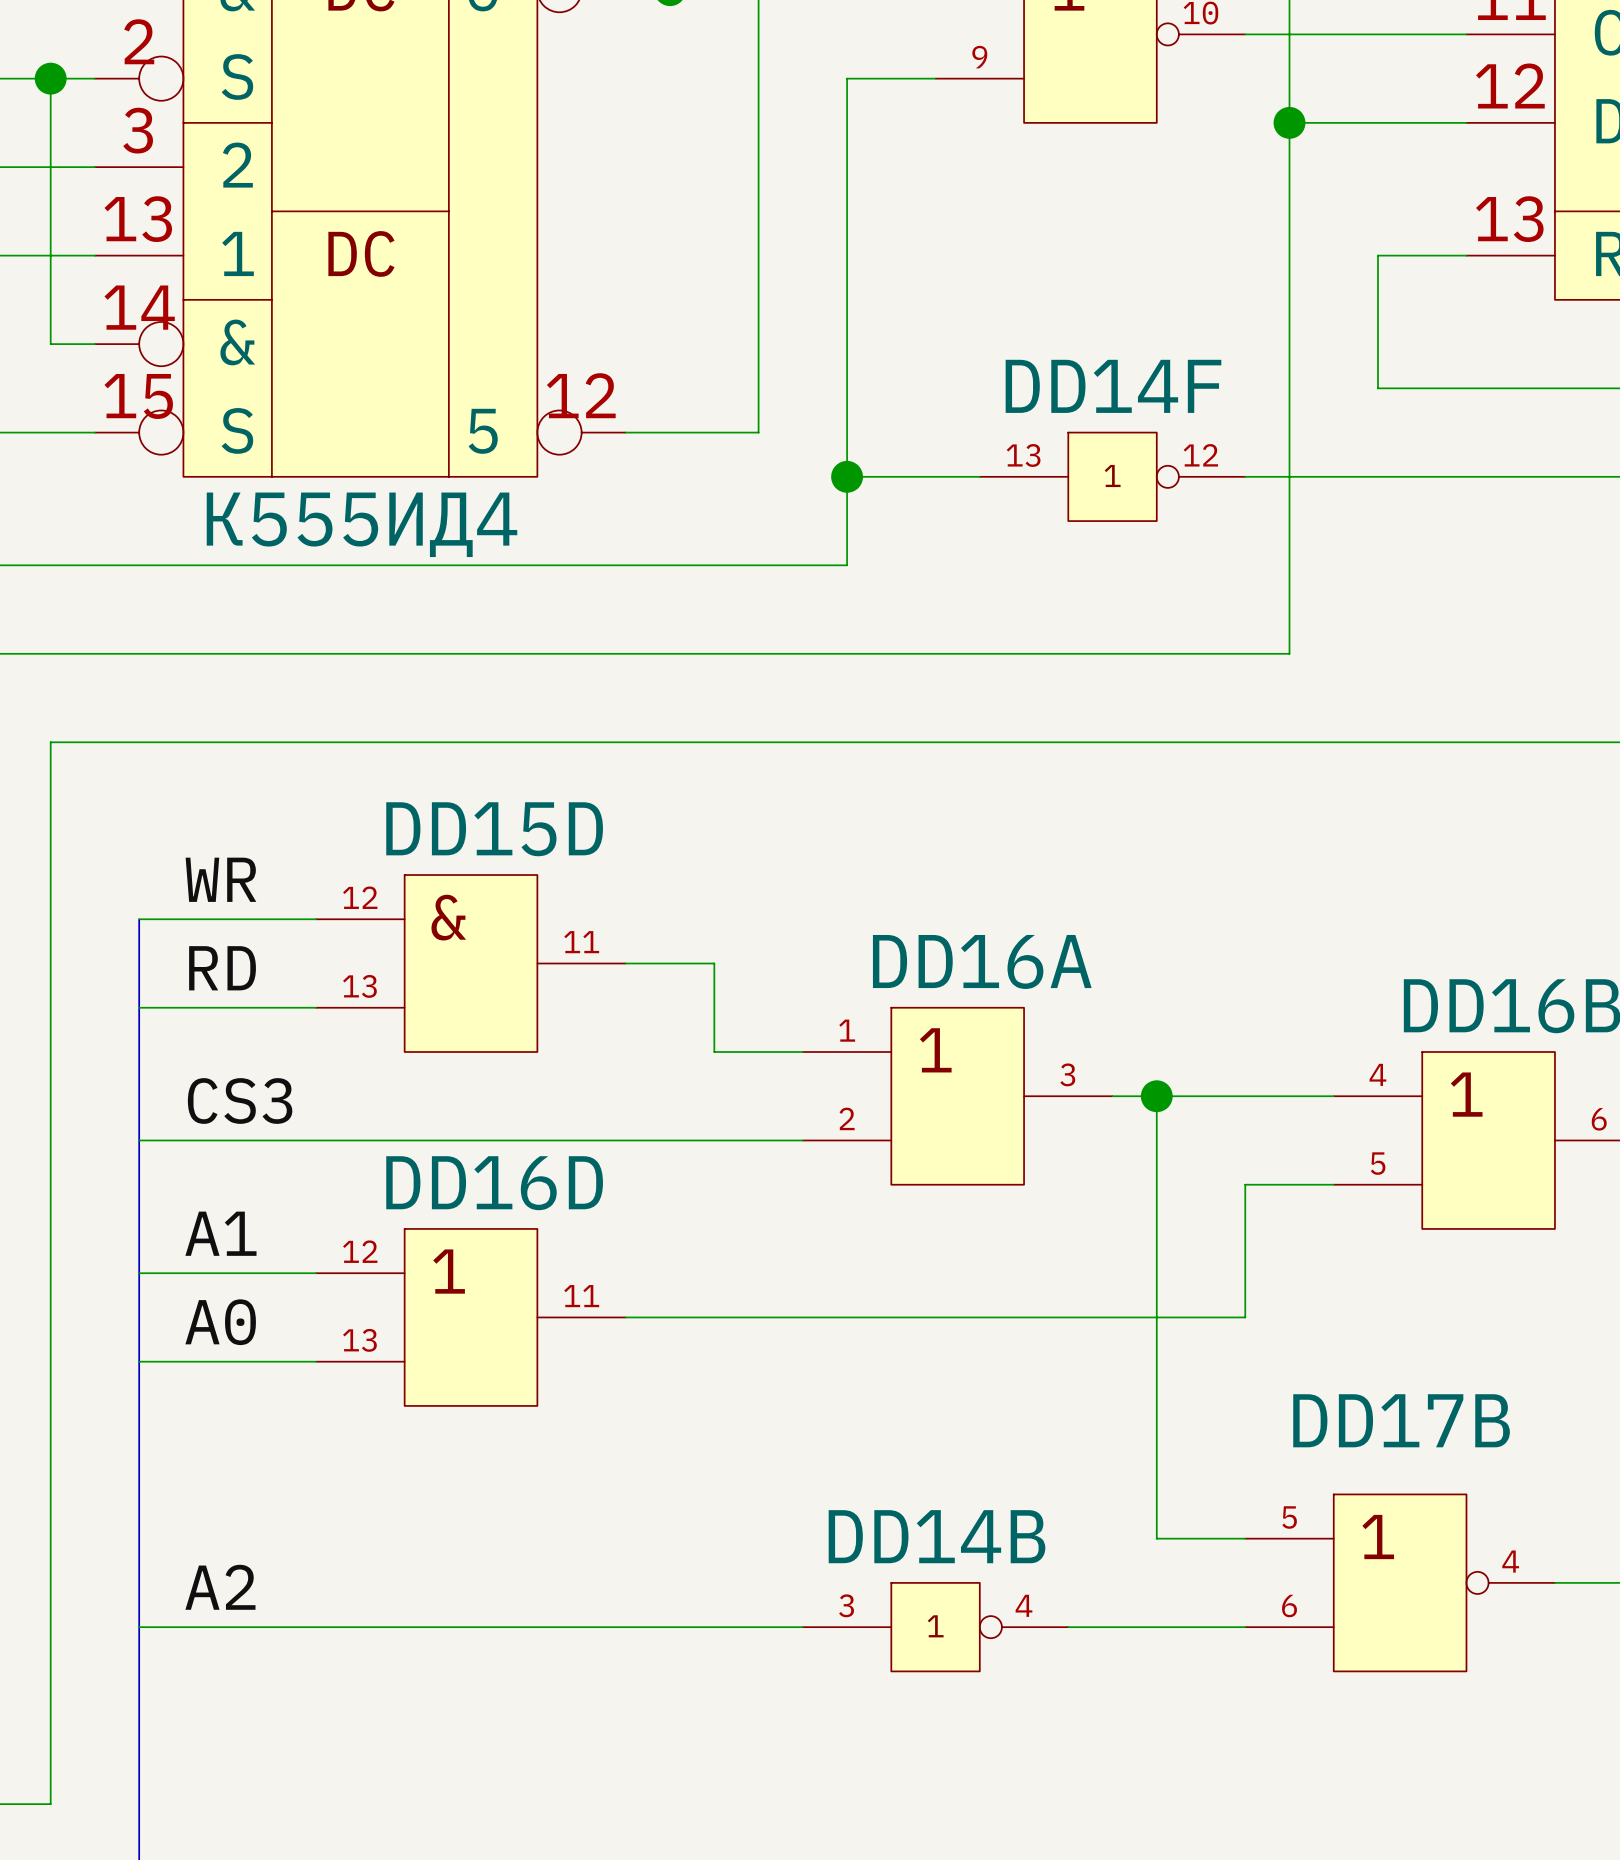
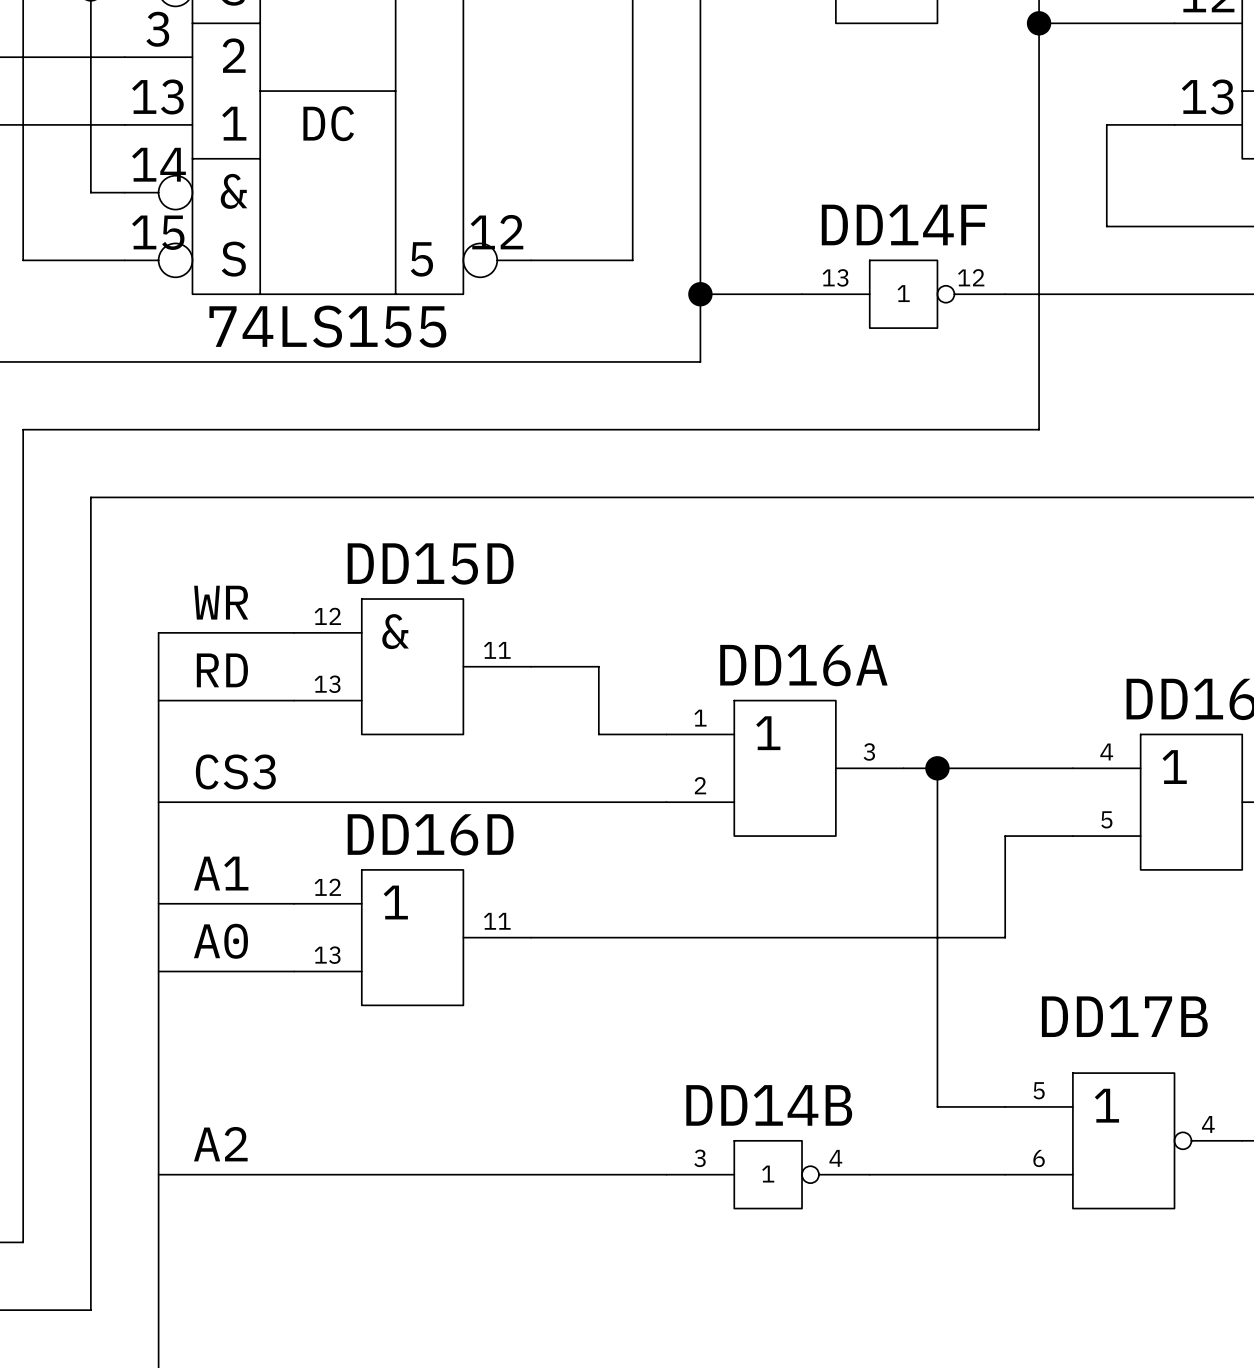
part value: К555ИД4 (362, 524) -> 74LS155 (327, 326)

